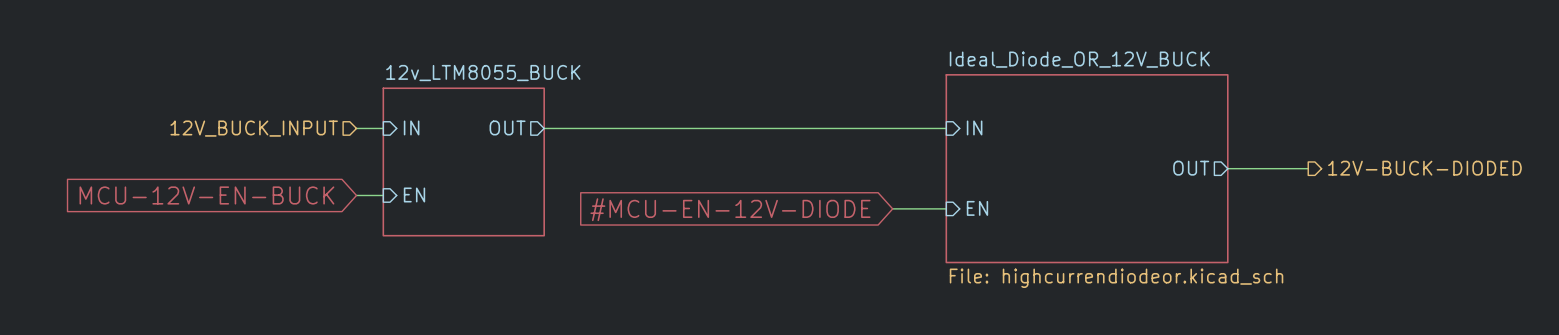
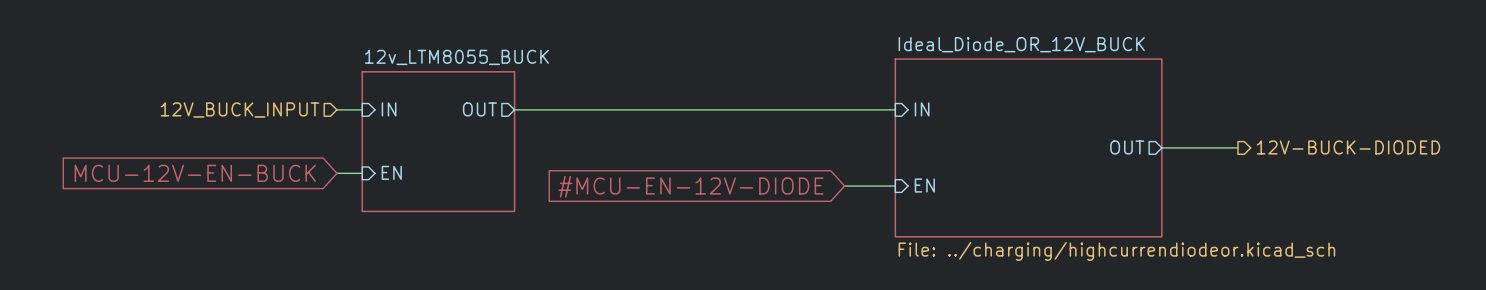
sheet Ideal_Diode_OR_12V_BUCK value: File: highcurrendiodeor.kicad_sch (1116, 278) -> File: ../charging/highcurrendiodeor.kicad_sch (1116, 251)

